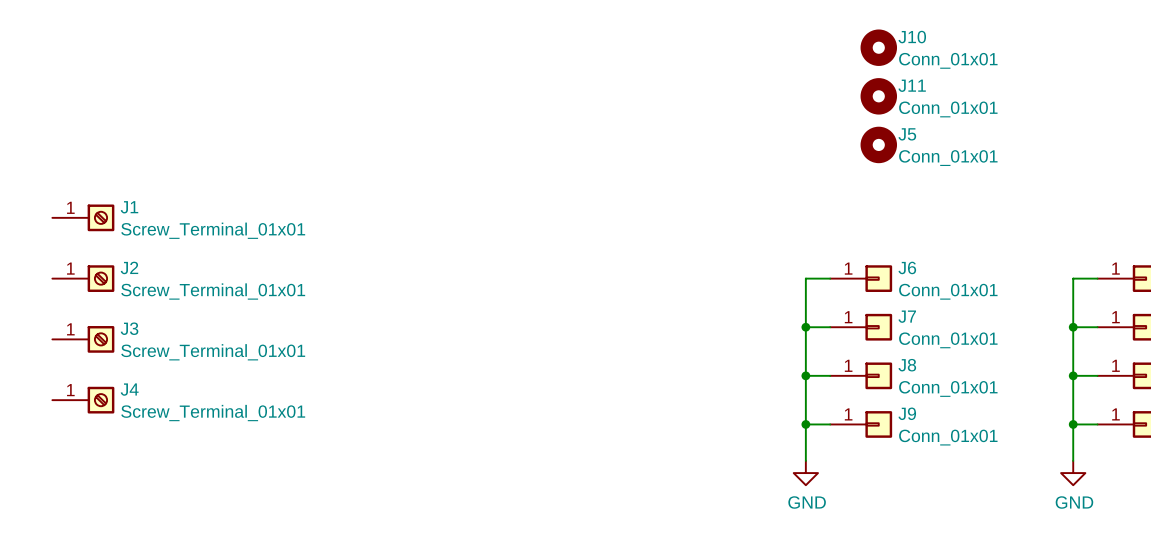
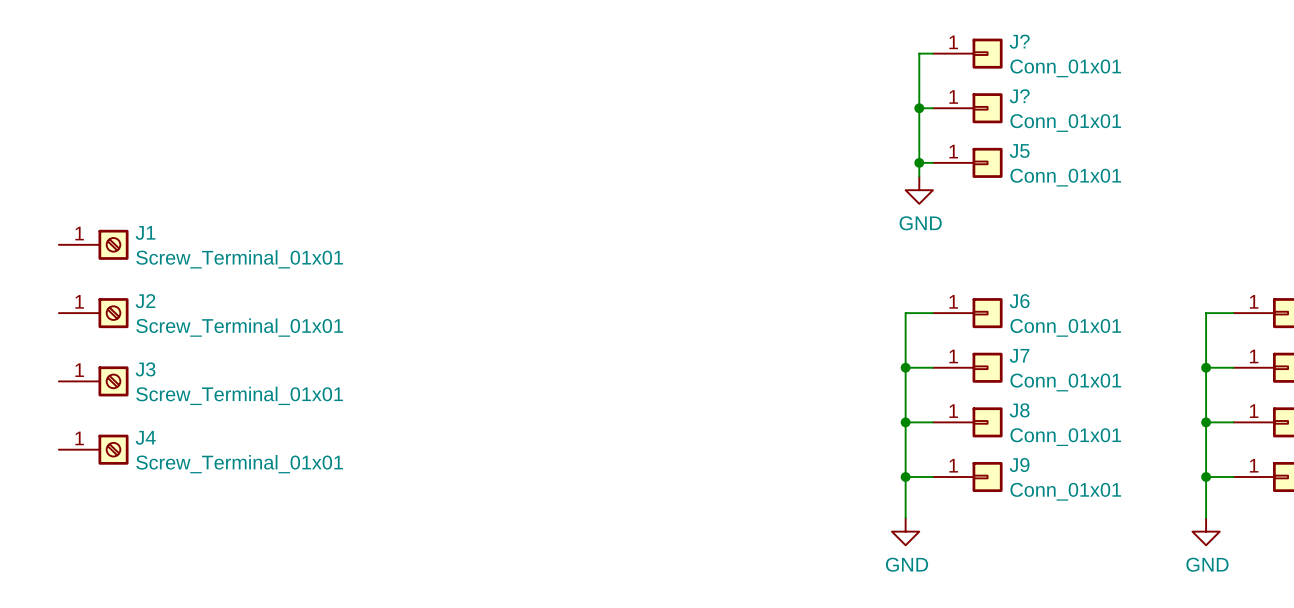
wire: none -> (932, 53) (919, 53) (919, 176)
J?: none -> Conn_01x01 (967, 53)
J10: Conn_01x01 (878, 47) -> none
wire: none -> (919, 108) (932, 108)
junction: none -> (919, 108)
J?: none -> Conn_01x01 (967, 108)
J11: Conn_01x01 (878, 96) -> none
J5 symbol: [860, 126, 898, 164] -> [932, 147, 1003, 178]
wire: none -> (919, 162) (932, 162)
junction: none -> (919, 162)
power symbol: none -> GND (919, 190)

